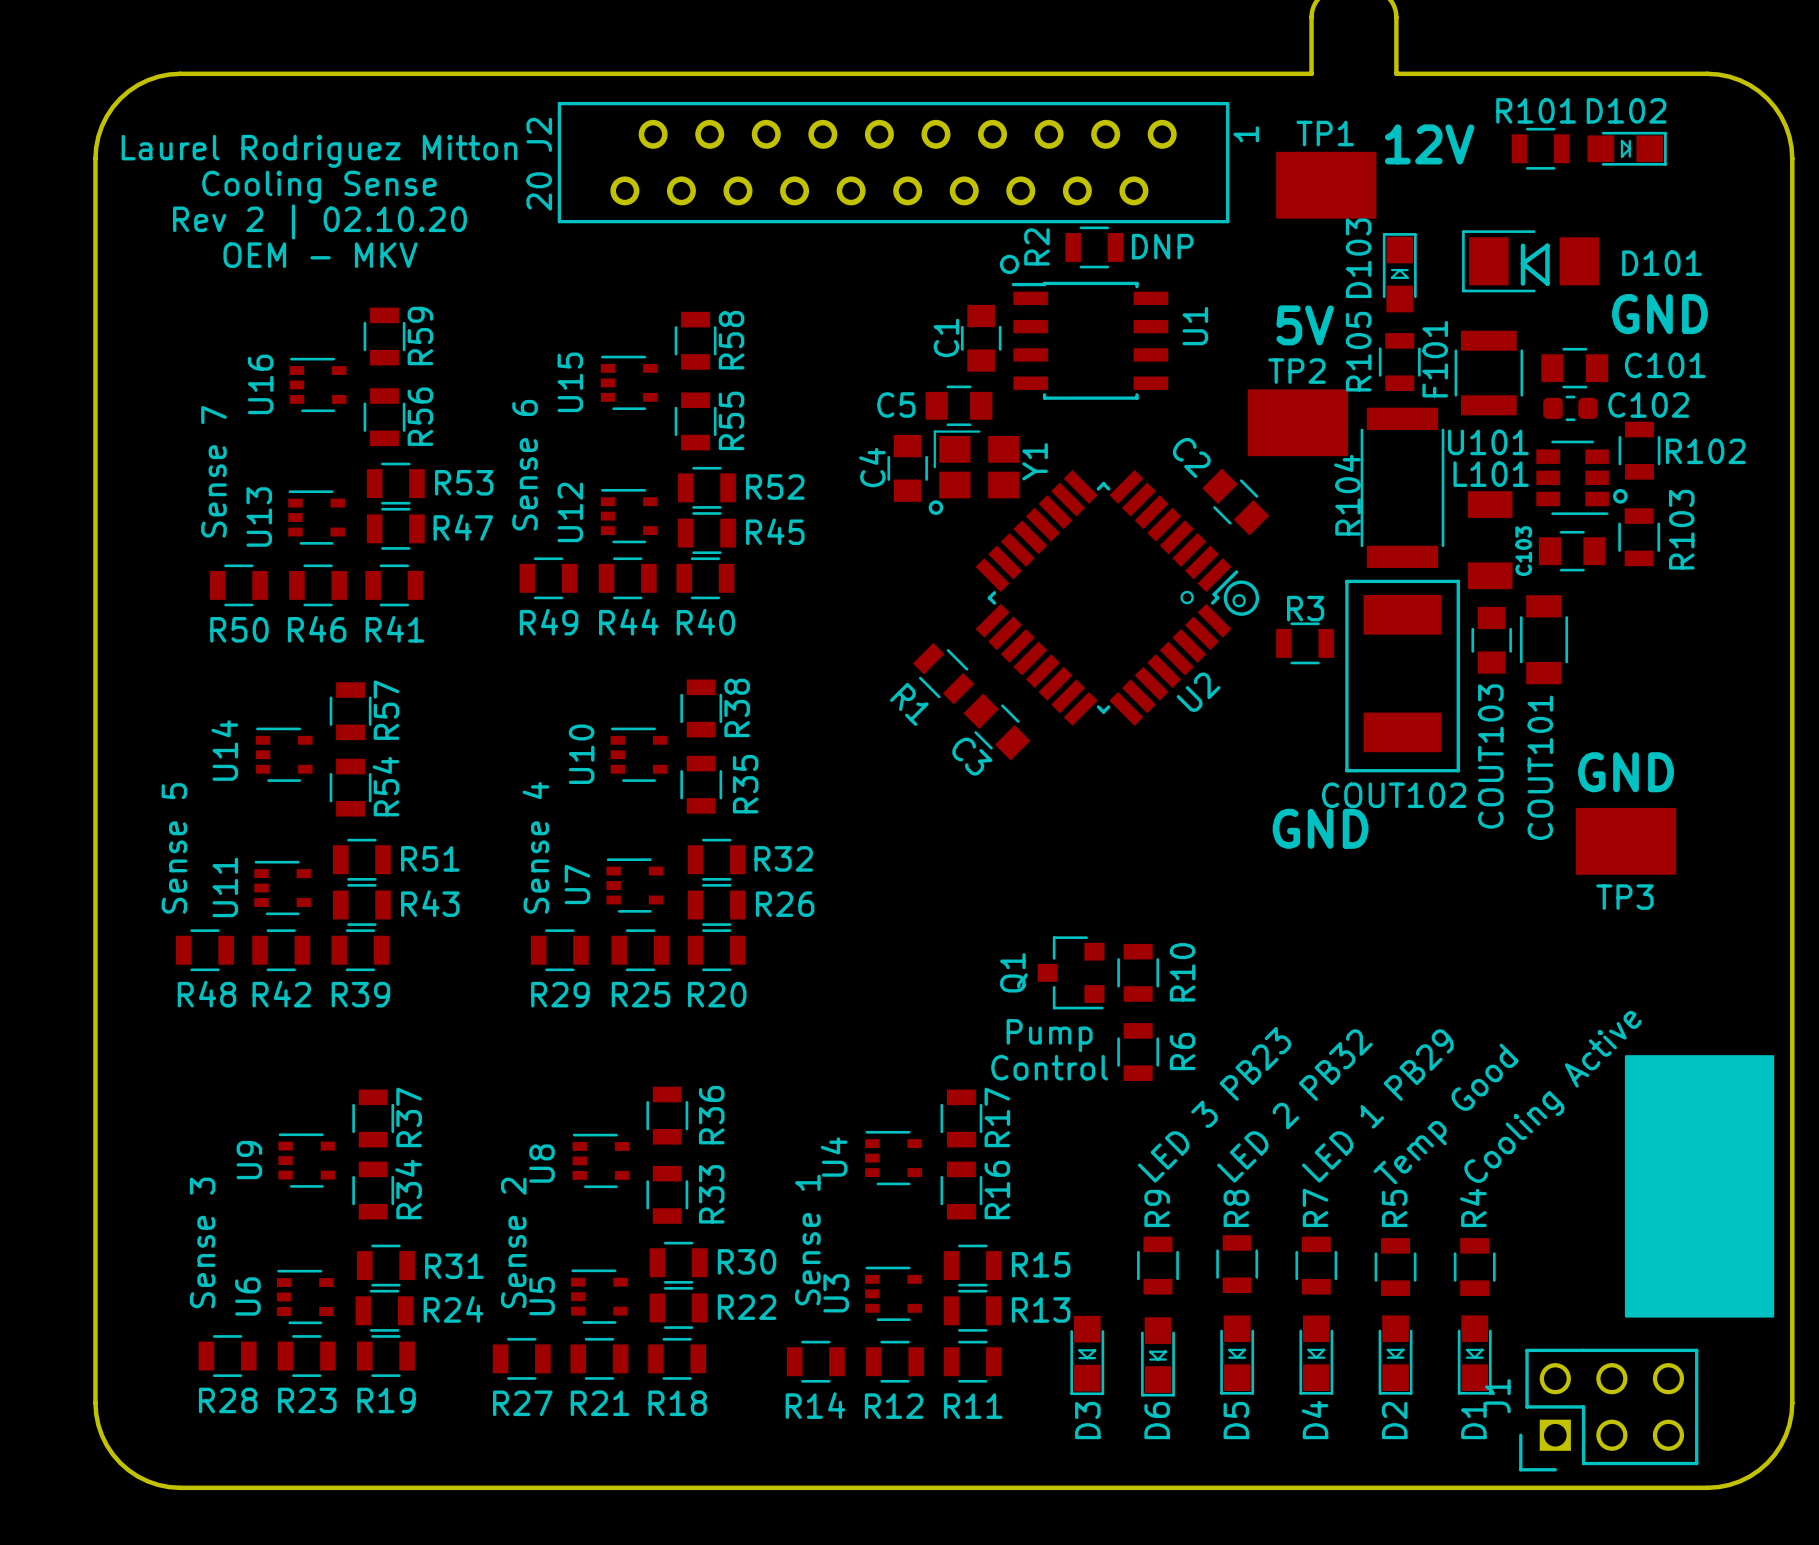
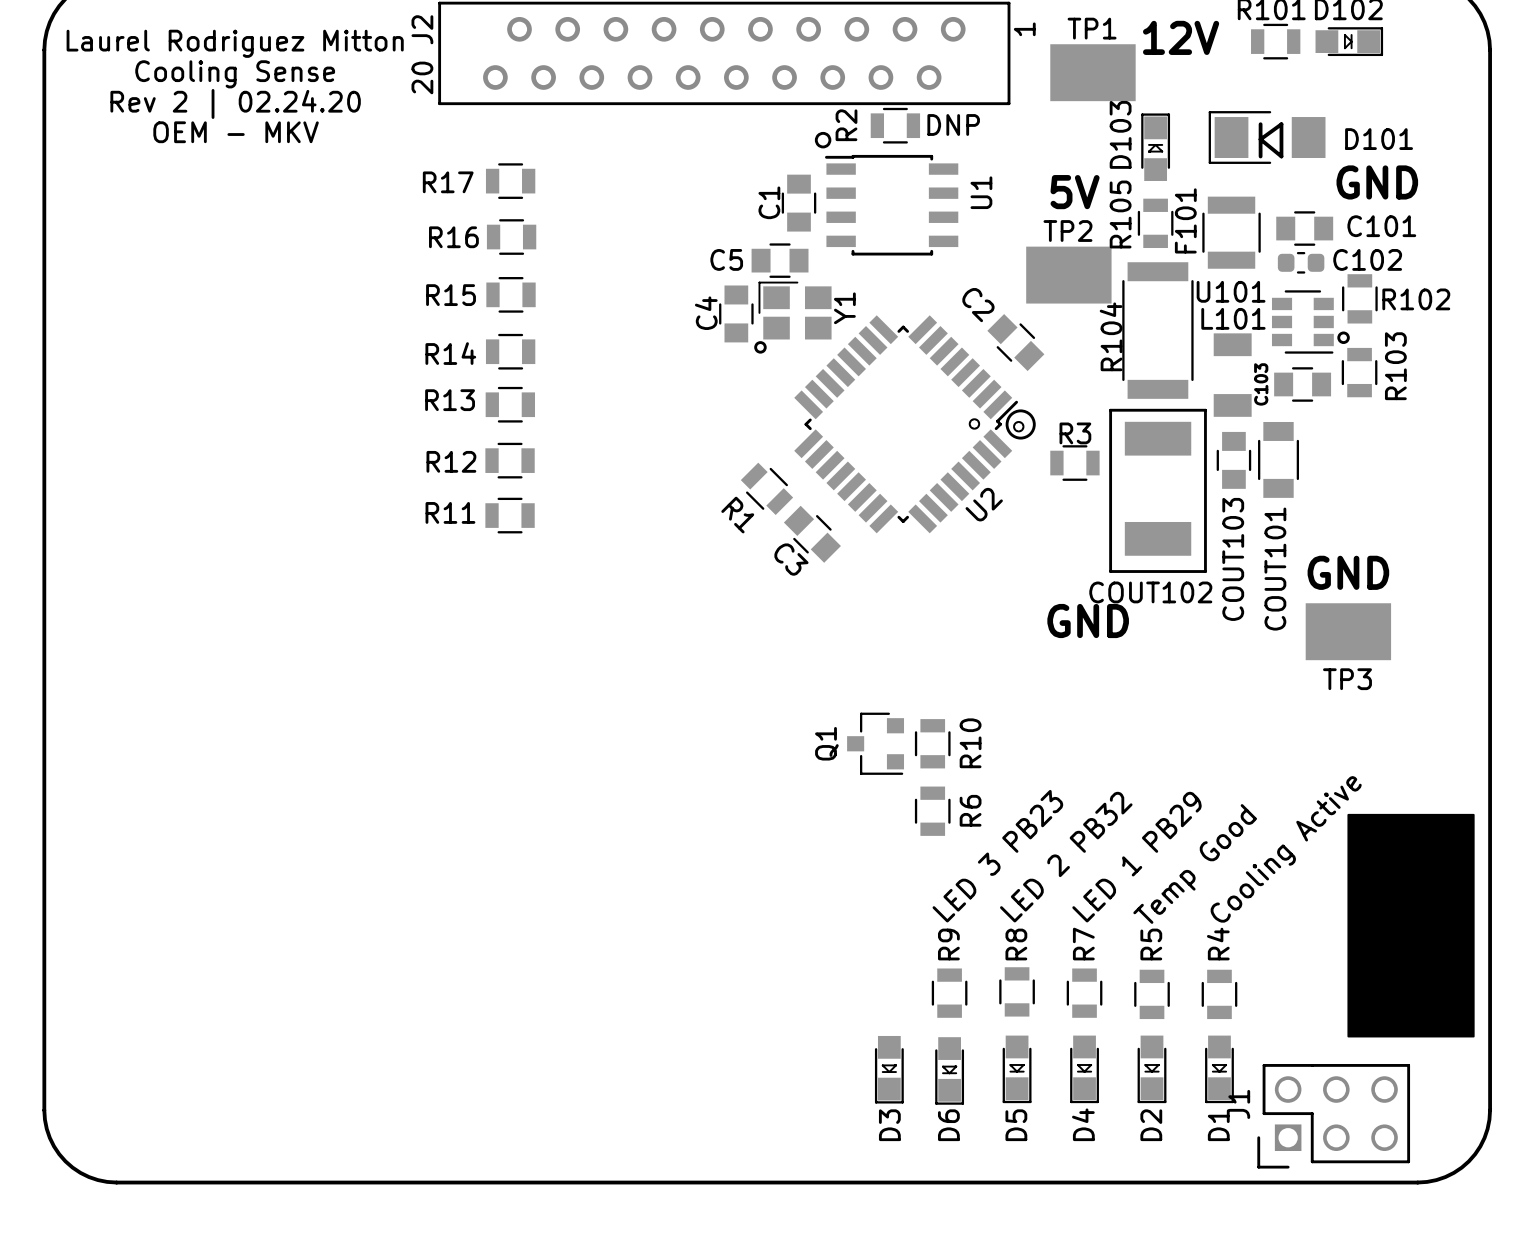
text: Rev 2 | 02.10.20 (319, 221) -> Rev 2 | 02.24.20 (235, 103)
R59: (384, 336) -> none
R58: (695, 340) -> none
U15: (629, 382) -> none
U16: (318, 384) -> none
R56: (384, 417) -> none
R55: (695, 421) -> none
text: Sense 6 (525, 465) -> none
text: Sense 7 (213, 471) -> none
R53: (395, 483) -> none
R52: (706, 487) -> none
U12: (629, 516) -> none
U13: (316, 517) -> none
R47: (395, 528) -> none
R45: (706, 533) -> none
R49: (548, 578) -> none
R44: (627, 578) -> none
R40: (705, 578) -> none
R50: (238, 585) -> none
R46: (318, 585) -> none
R41: (394, 585) -> none
R38: (701, 708) -> none
R57: (350, 711) -> none
U14: (284, 754) -> none
U10: (639, 754) -> none
R35: (701, 784) -> none
R54: (350, 787) -> none
text: Sense 4 (535, 847) -> none
text: Sense 5 (174, 848) -> none
R51: (361, 859) -> none
R32: (716, 859) -> none
U7: (634, 885) -> none
U11: (282, 888) -> none
R43: (361, 904) -> none
R26: (716, 904) -> none
R48: (204, 950) -> none
R42: (281, 950) -> none
R39: (360, 950) -> none
R29: (559, 950) -> none
R25: (640, 950) -> none
R20: (716, 950) -> none
text: Pump (1049, 1035) -> none
text: Control (1049, 1067) -> none
R36: (667, 1115) -> none
R17 name position: R17 (997, 1117) -> R17 (448, 182)
R37: (373, 1118) -> none
R17 rotation: 0° (961, 1118) -> 90° clockwise (510, 181)
R17 position: (961, 1118) -> (510, 181)
U4: (893, 1158) -> none
U9: (306, 1160) -> none
U8: (600, 1160) -> none
R34: (373, 1190) -> none
R16 rotation: 0° (961, 1190) -> 90° clockwise (511, 237)
R16 position: (961, 1190) -> (511, 237)
R16 name position: R16 (997, 1190) -> R16 (453, 237)
R33: (667, 1194) -> none
text: Sense 1 (807, 1240) -> none
text: Sense 3 (202, 1242) -> none
text: Sense 2 (513, 1242) -> none
R30: (678, 1262) -> none
R15 name position: R15 (1041, 1264) -> R15 (451, 295)
R31: (385, 1265) -> none
R15 position: (972, 1265) -> (511, 294)
U3: (893, 1293) -> none
U6: (305, 1296) -> none
U5: (599, 1296) -> none
R22: (678, 1307) -> none
R13 name position: R13 (1041, 1309) -> R13 (450, 400)
R24: (384, 1310) -> none
R13 position: (972, 1310) -> (510, 404)
R28: (227, 1356) -> none
R23: (306, 1356) -> none
R19: (385, 1356) -> none
R27: (521, 1358) -> none
R21: (599, 1358) -> none
R18: (677, 1358) -> none
R14 position: (815, 1361) -> (510, 351)
R12 position: (895, 1361) -> (510, 460)
R11 position: (972, 1361) -> (510, 515)
R14 name position: R14 (815, 1405) -> R14 (450, 353)
R12 name position: R12 (894, 1406) -> R12 (451, 461)
R11 name position: R11 (973, 1406) -> R11 (450, 512)

